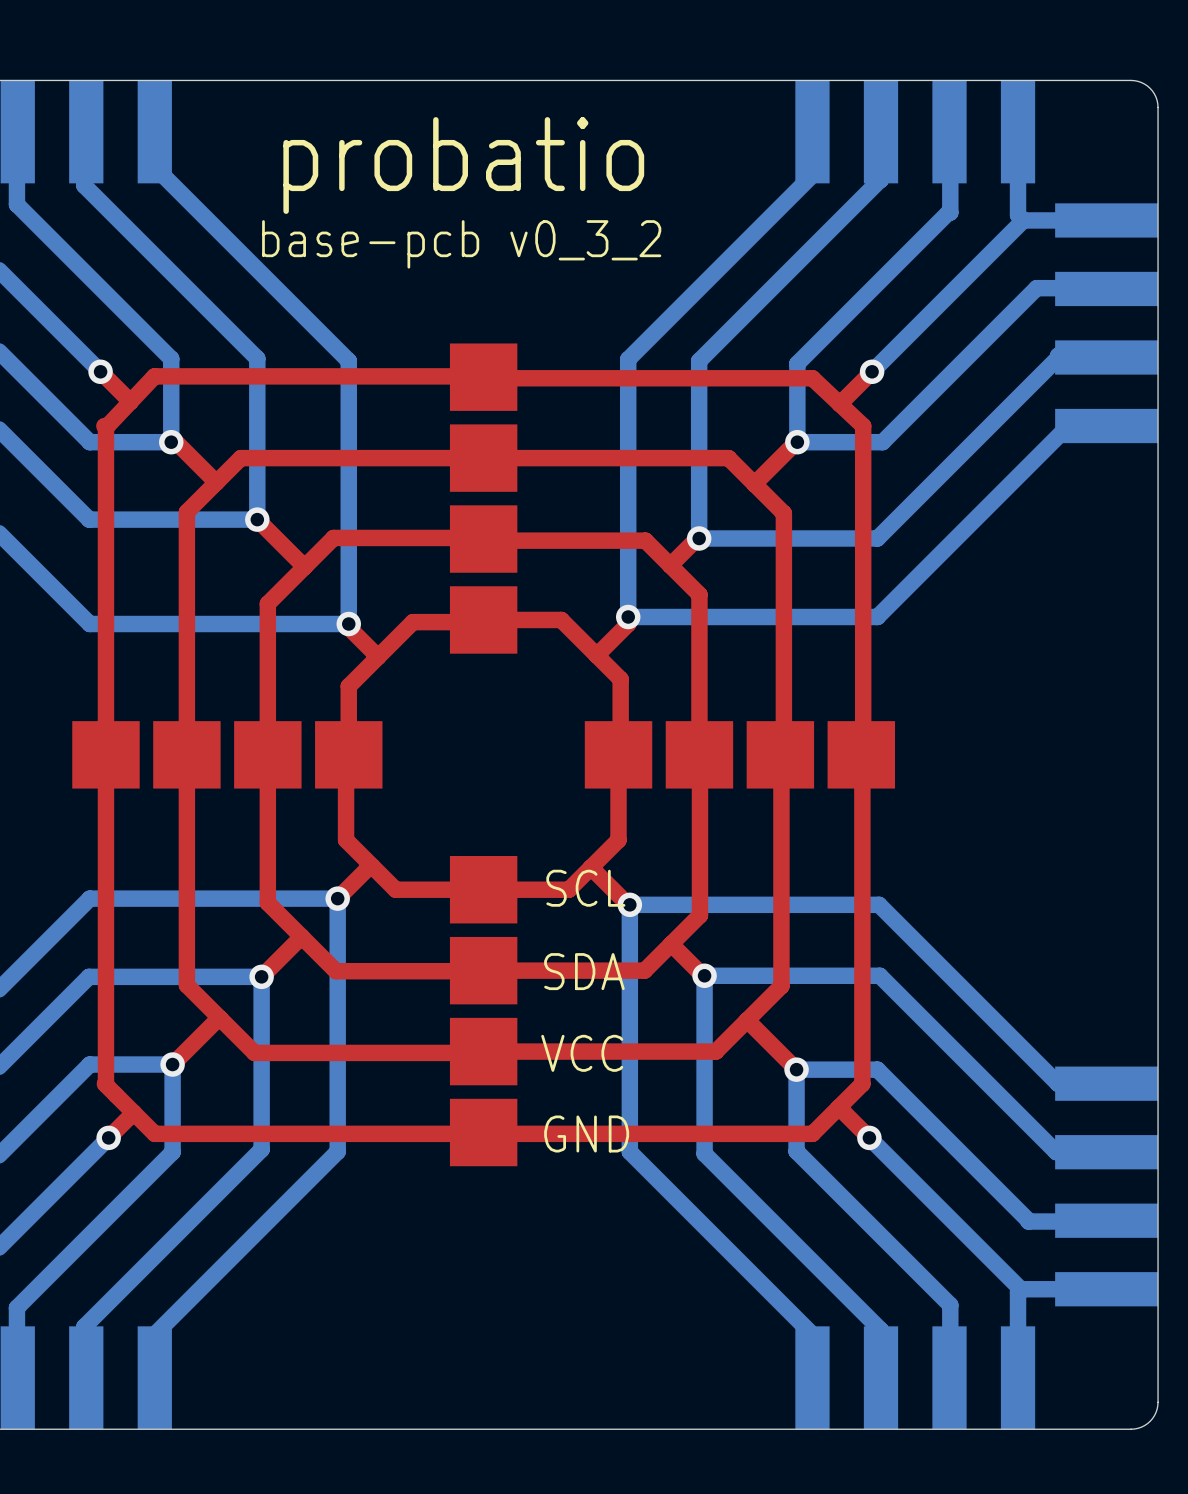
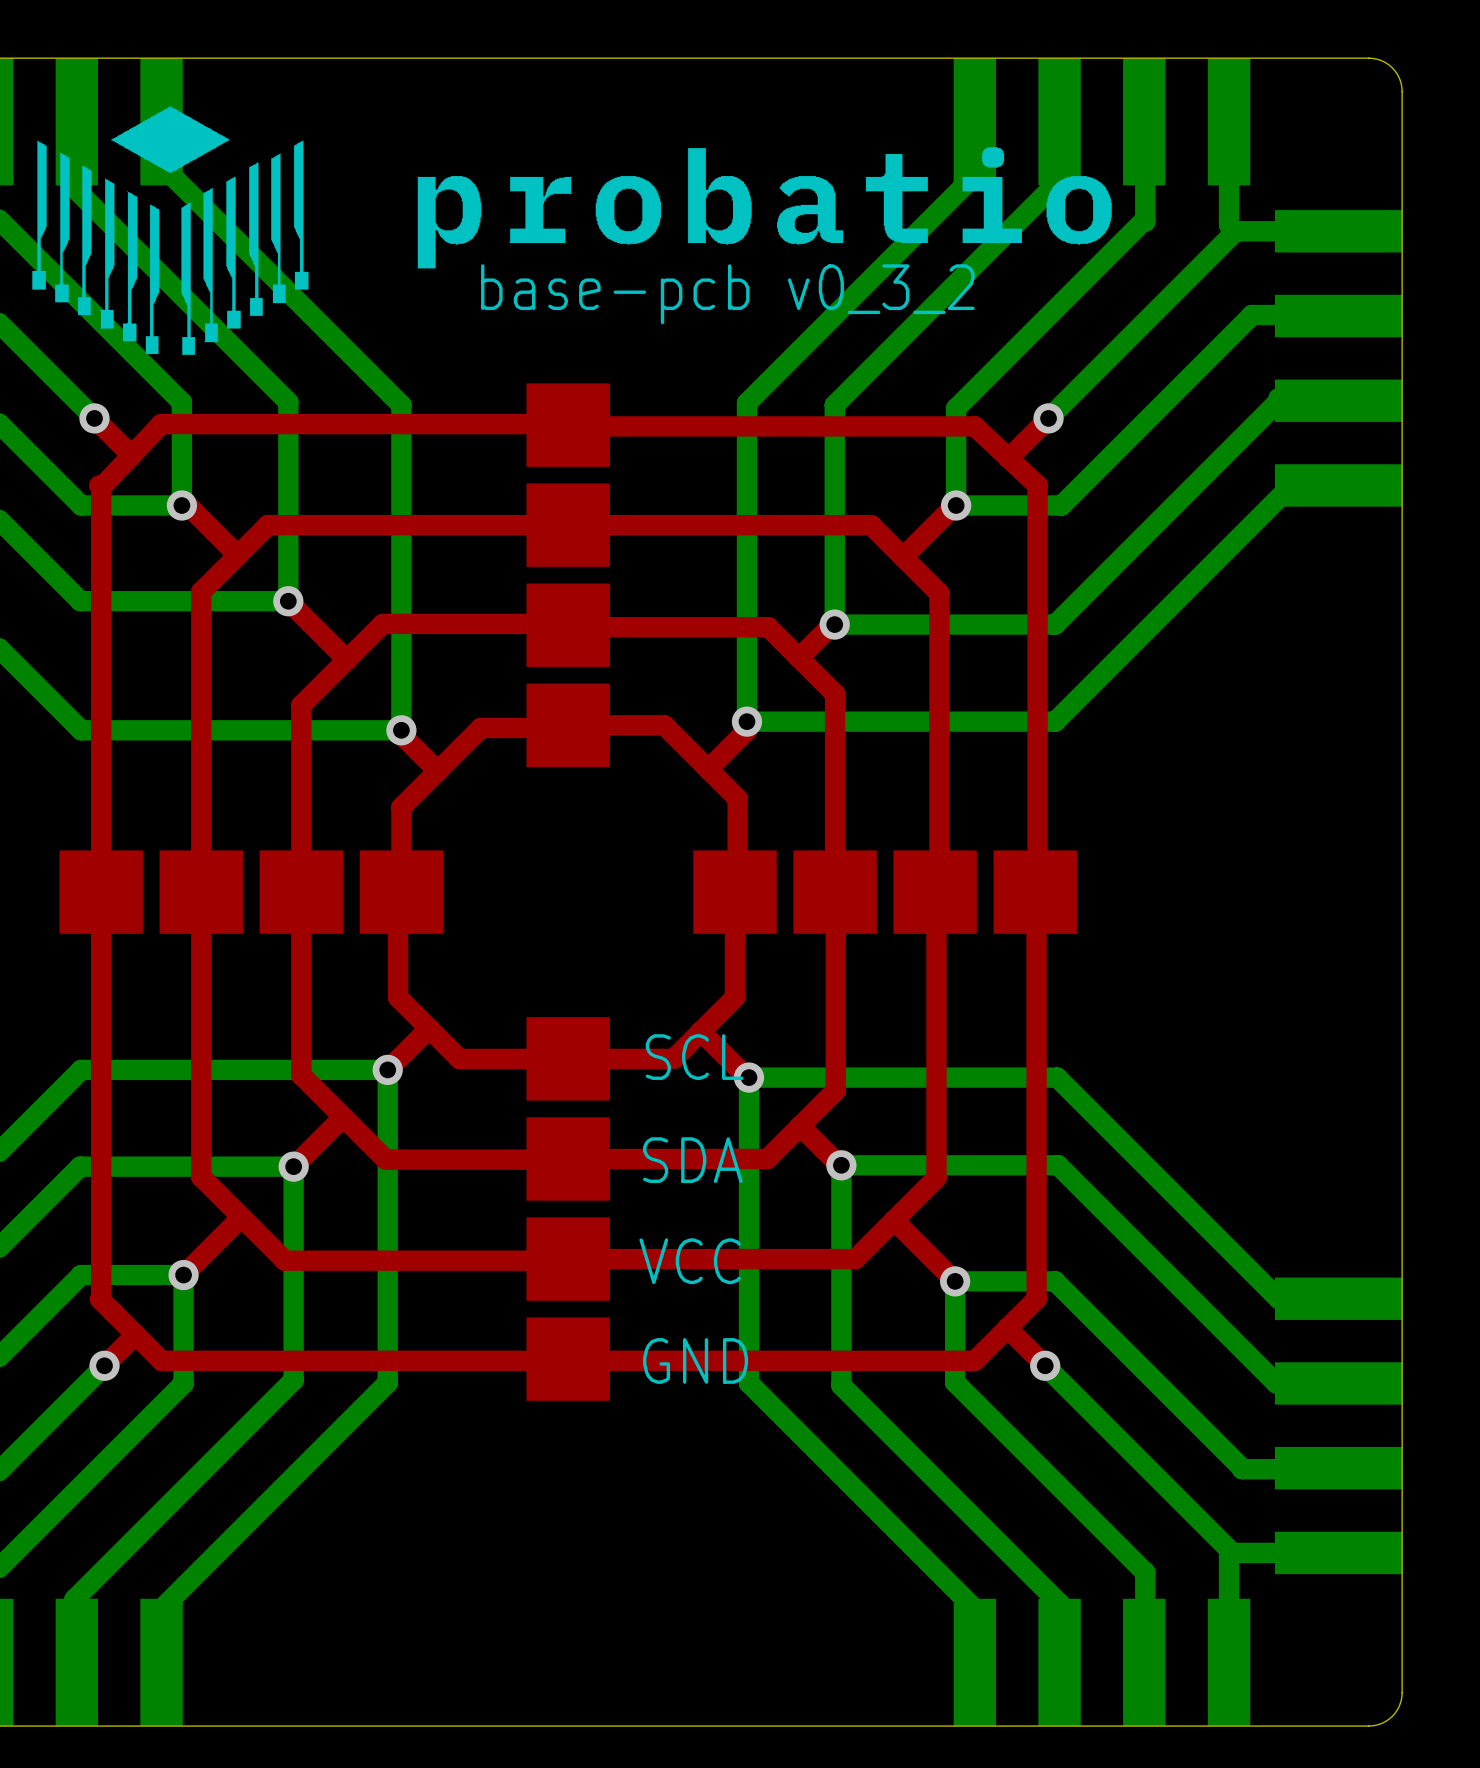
drawing: none -> [32, 106, 1112, 355]
text: probatio (463, 165) -> none
text position: base-pcb v0_3_2 (461, 244) -> base-pcb v0_3_2 (727, 294)

